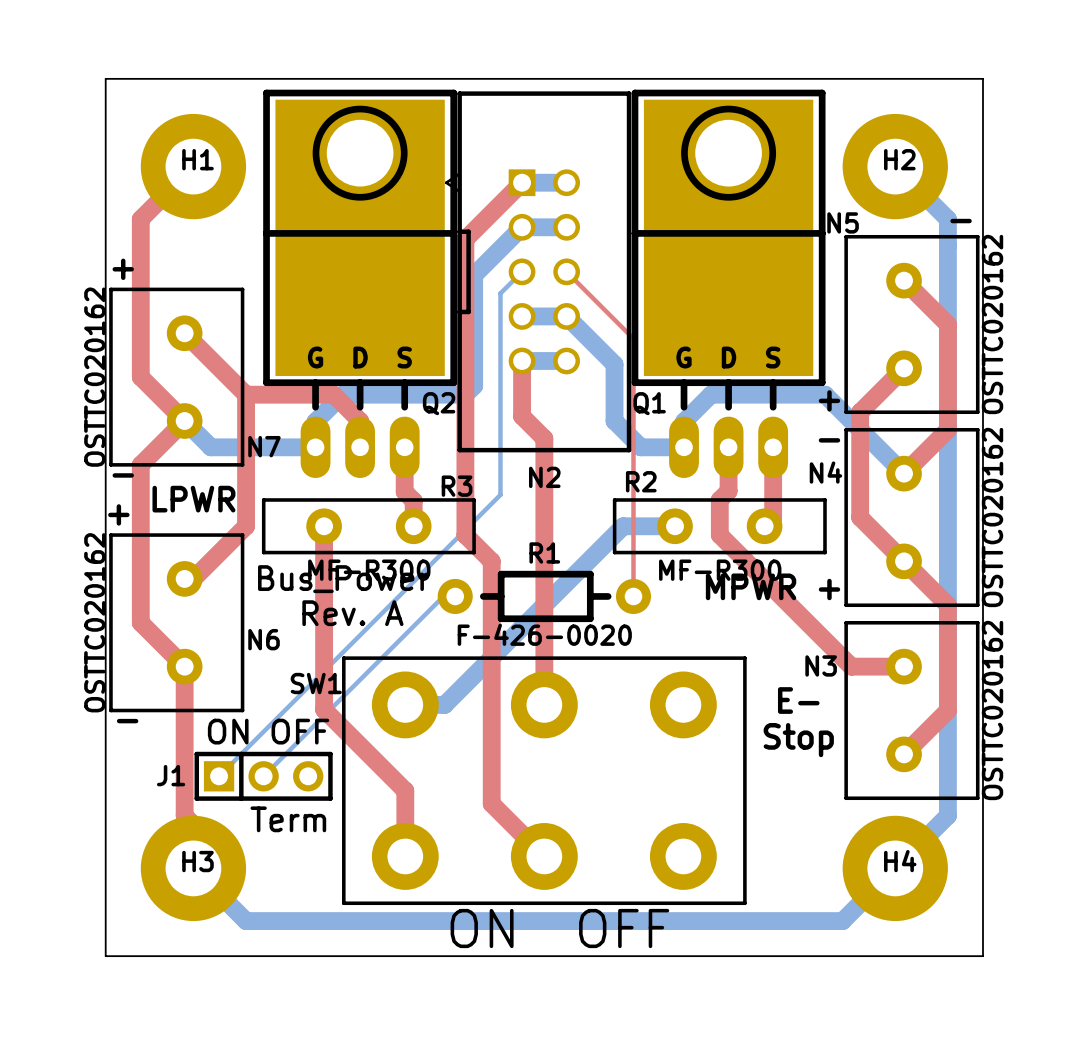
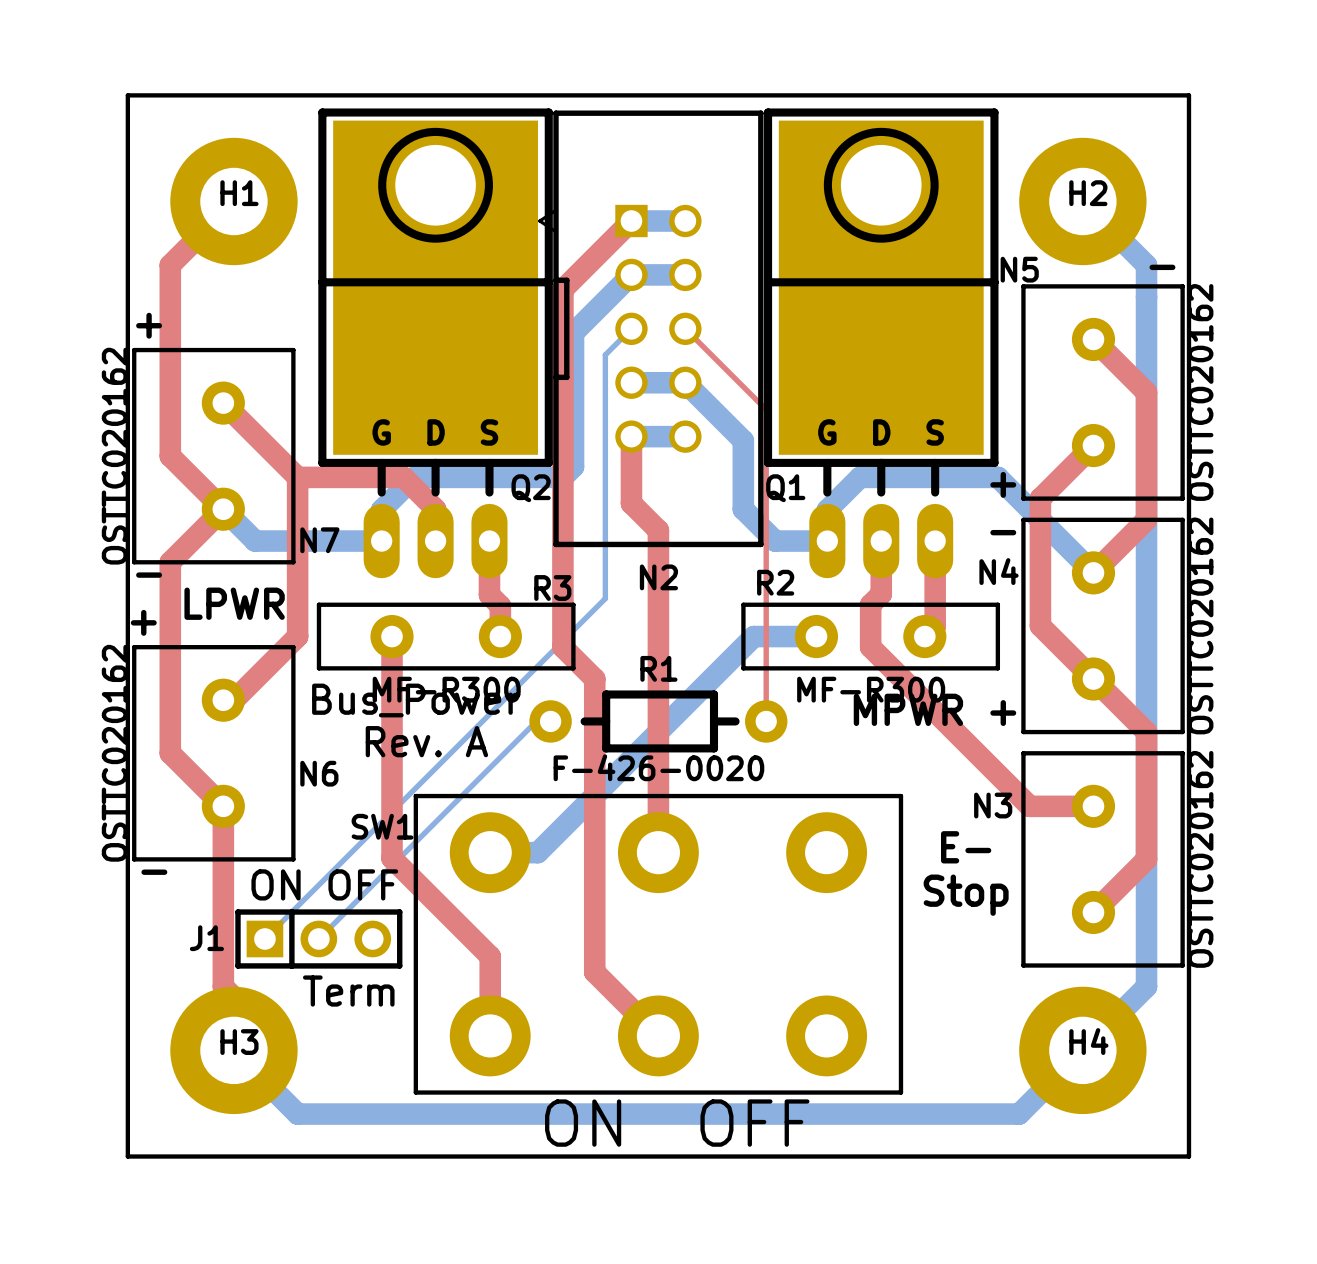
line: none -> (127, 95) (127, 1156) (1188, 1156) (1188, 95) (127, 95)

